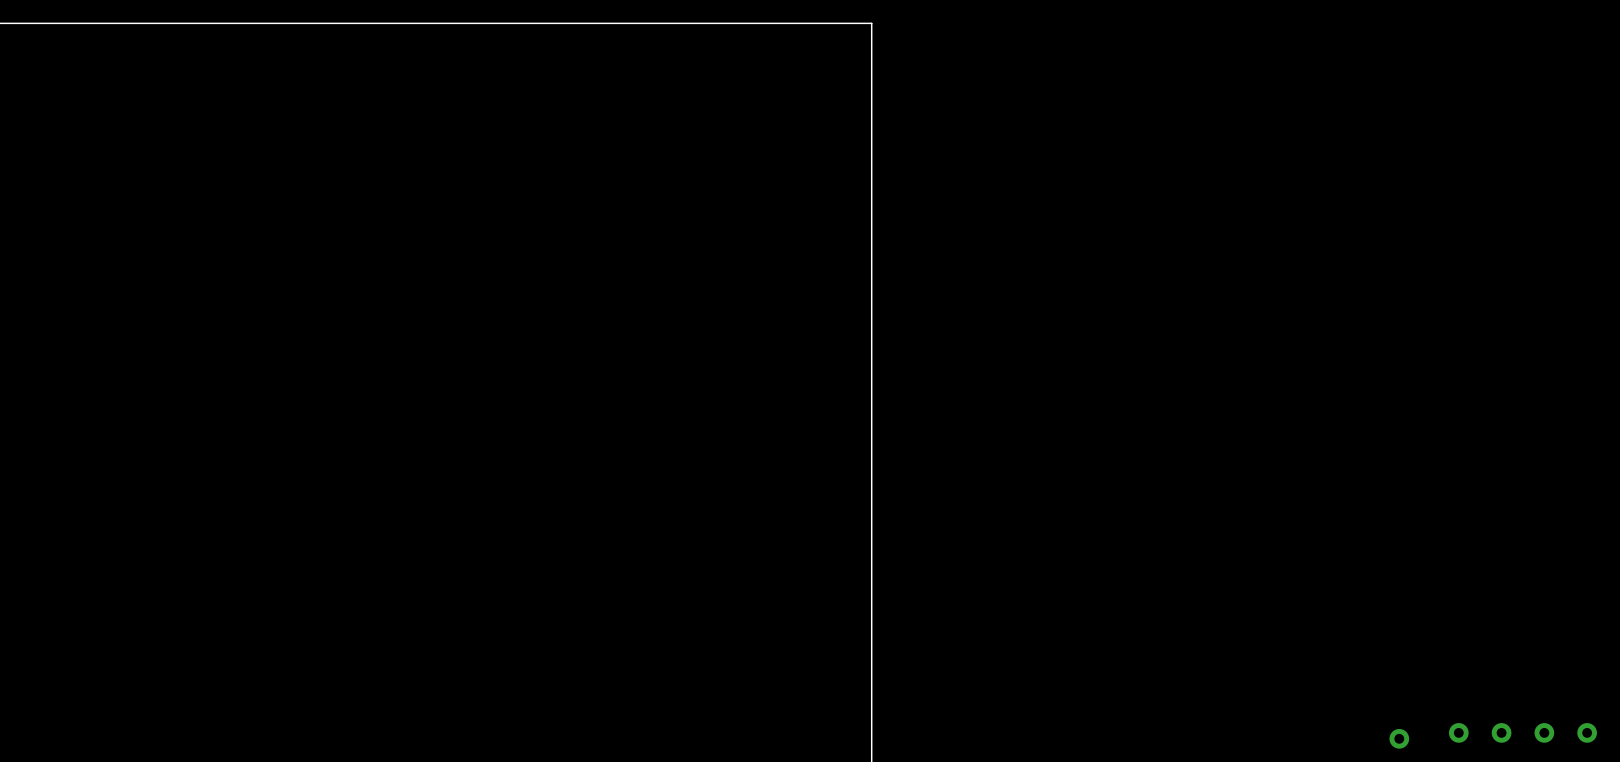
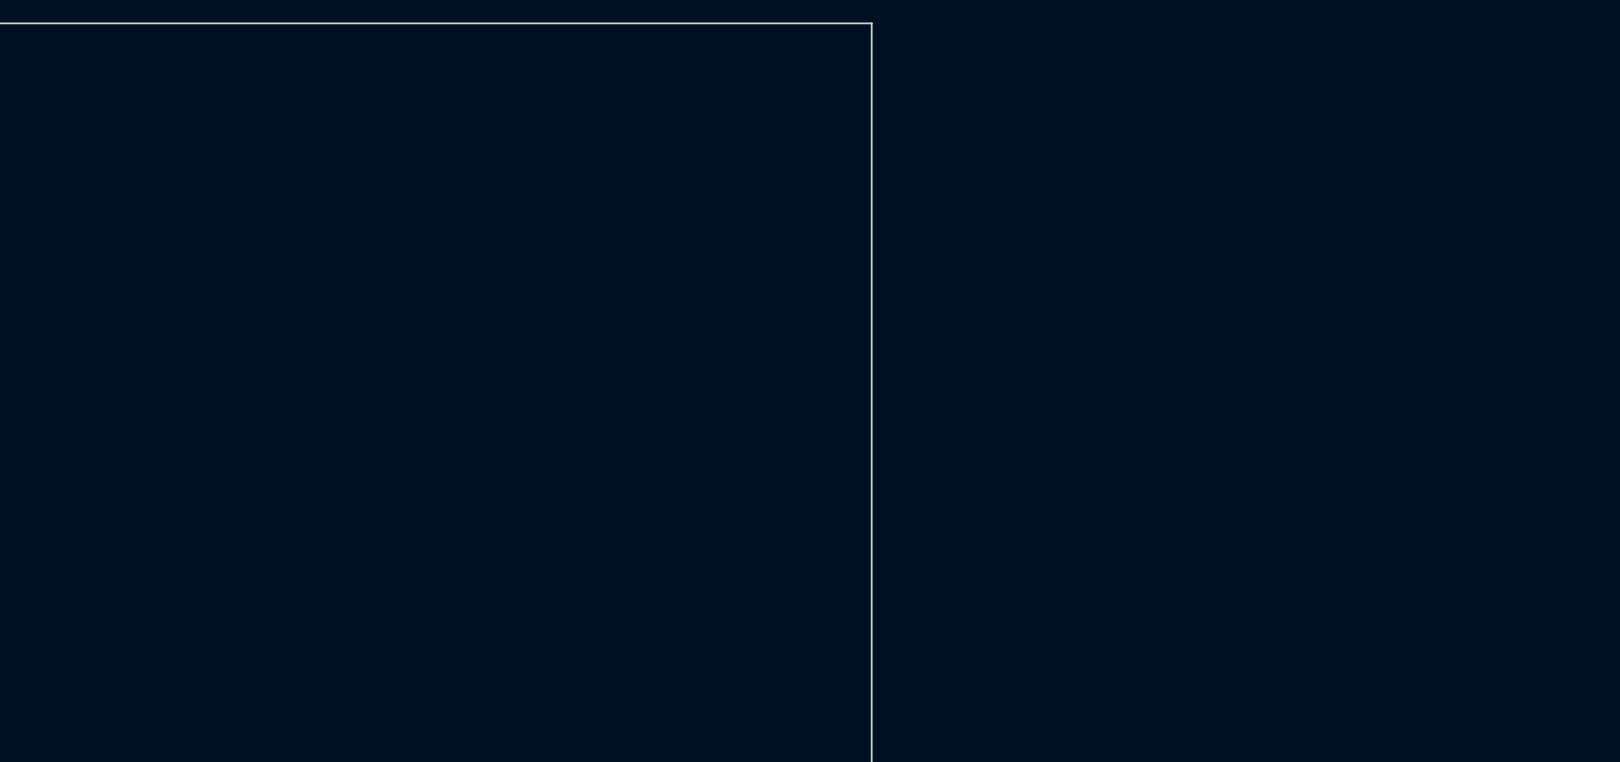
part: (1458, 732) -> none
part: (1501, 732) -> none
part: (1544, 732) -> none
part: (1587, 732) -> none
part: (1399, 738) -> none

